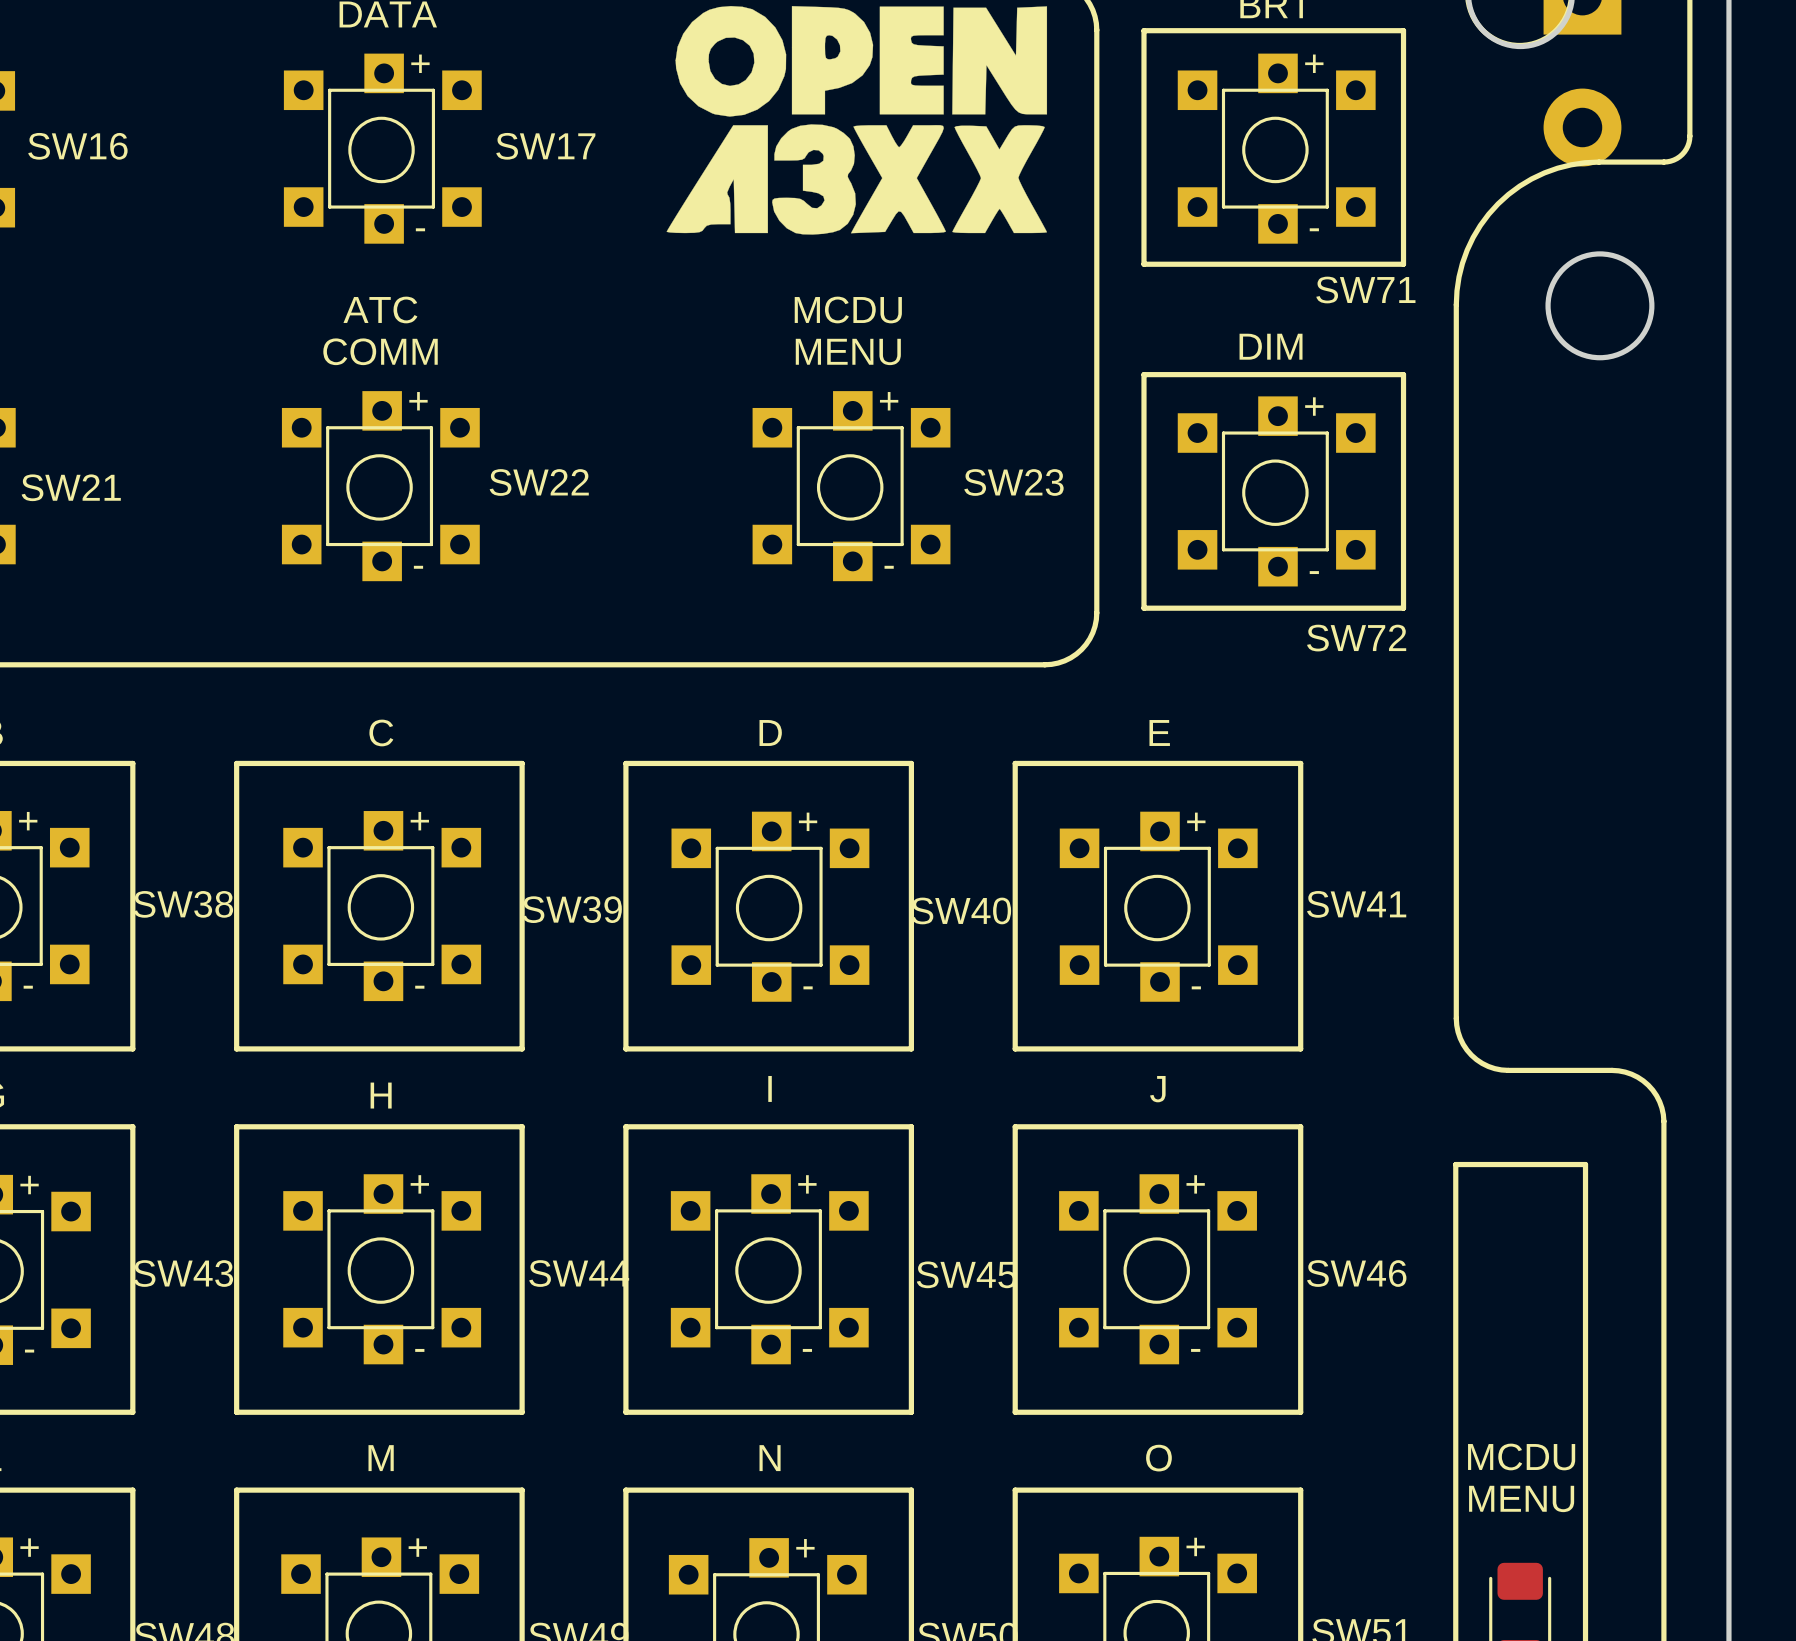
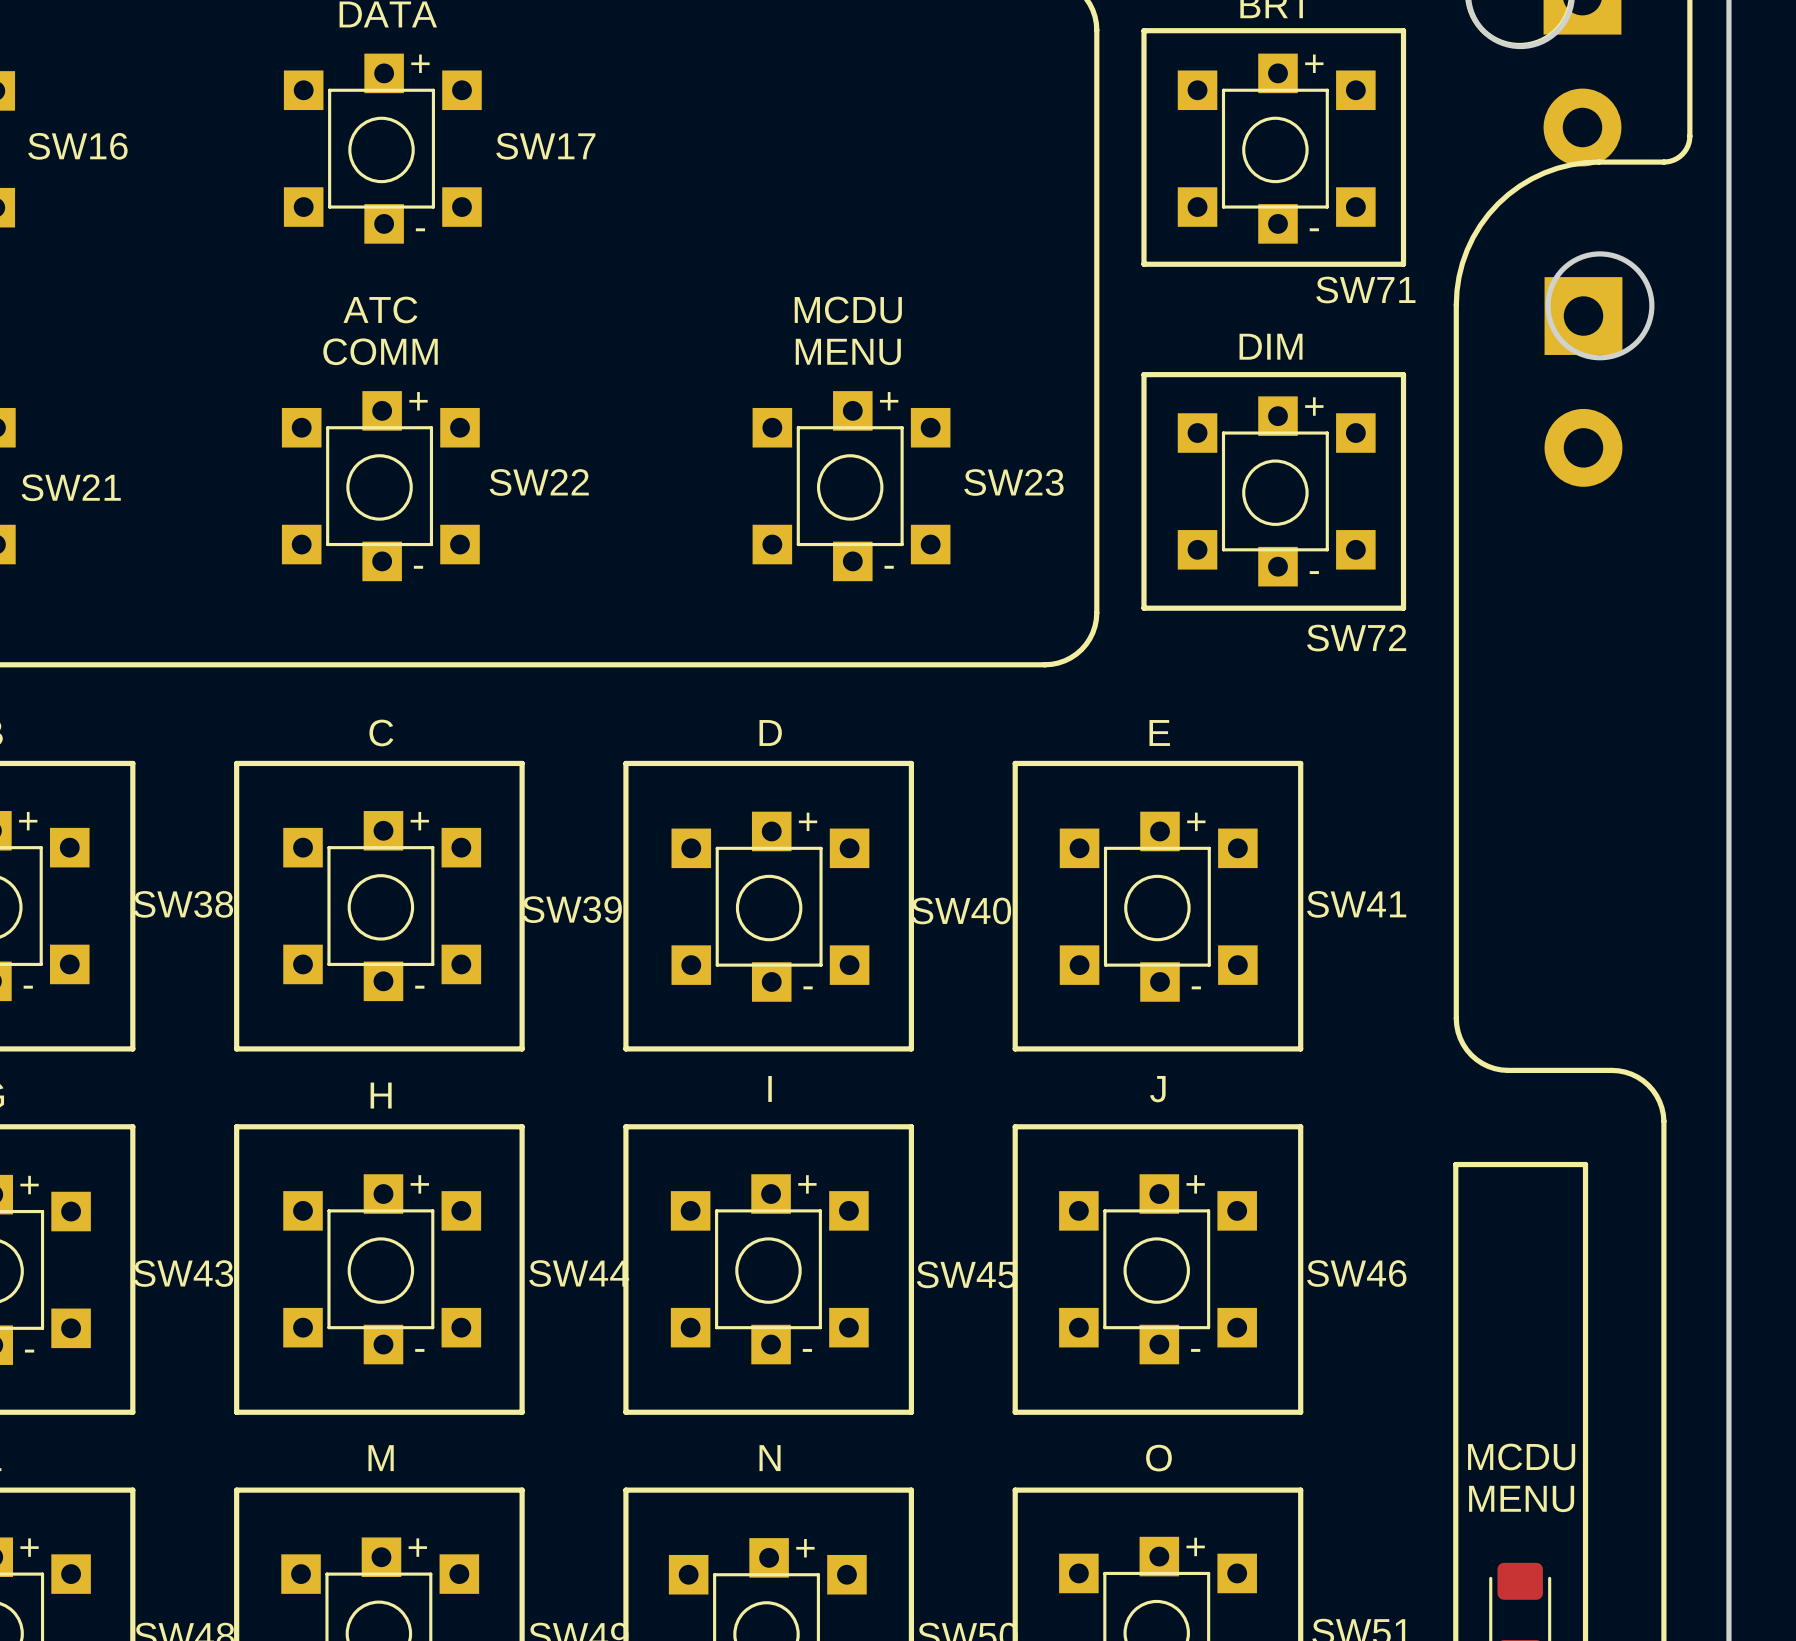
drawing: [666, 6, 1048, 235] -> none
part: none -> (1583, 381)

